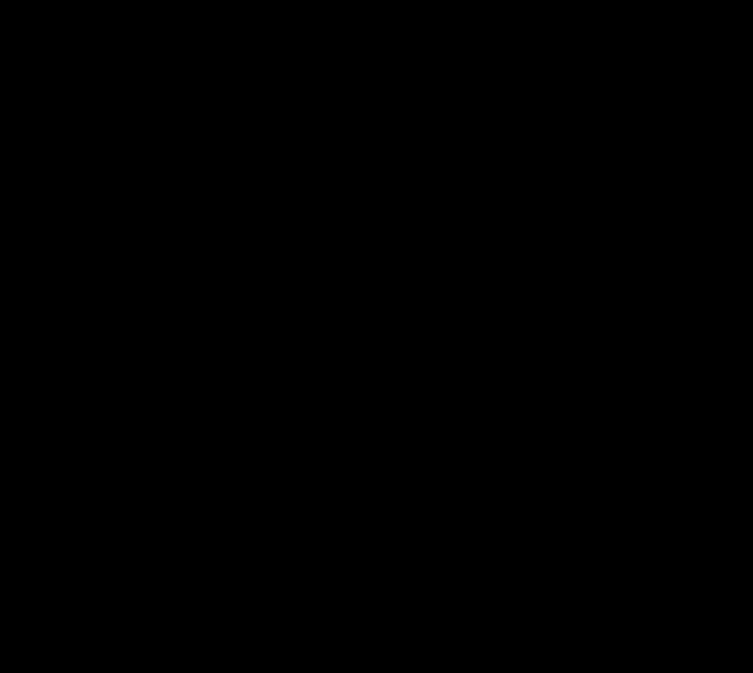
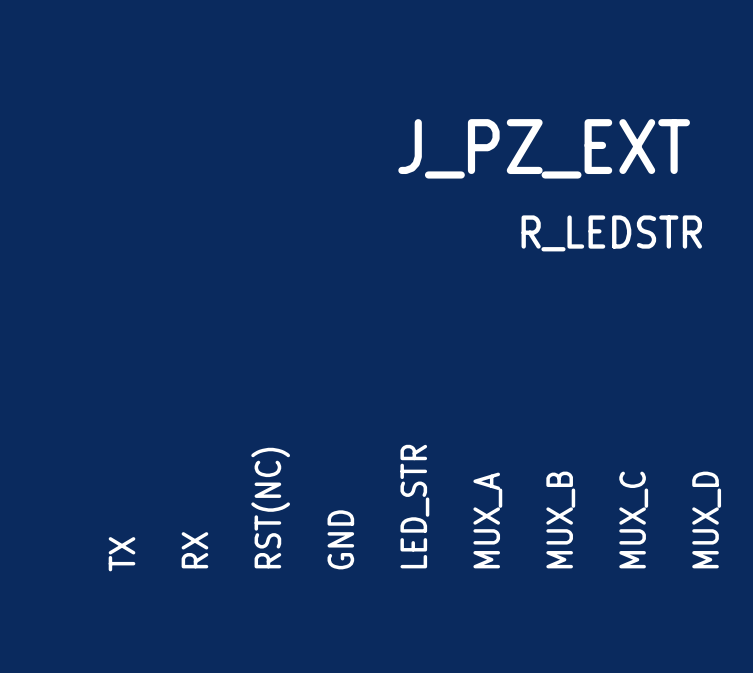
text: none -> J_PZ_EXT (544, 148)
text: none -> R_LEDSTR (611, 233)
text: none -> LED_STR (414, 506)
text: none -> RST(NC) (270, 508)
text: none -> MUX_A (487, 520)
text: none -> MUX_C (633, 520)
text: none -> MUX_D (706, 520)
text: none -> MUX_B (560, 520)
text: none -> GND (340, 539)
text: none -> RX (194, 550)
text: none -> TX (122, 554)

